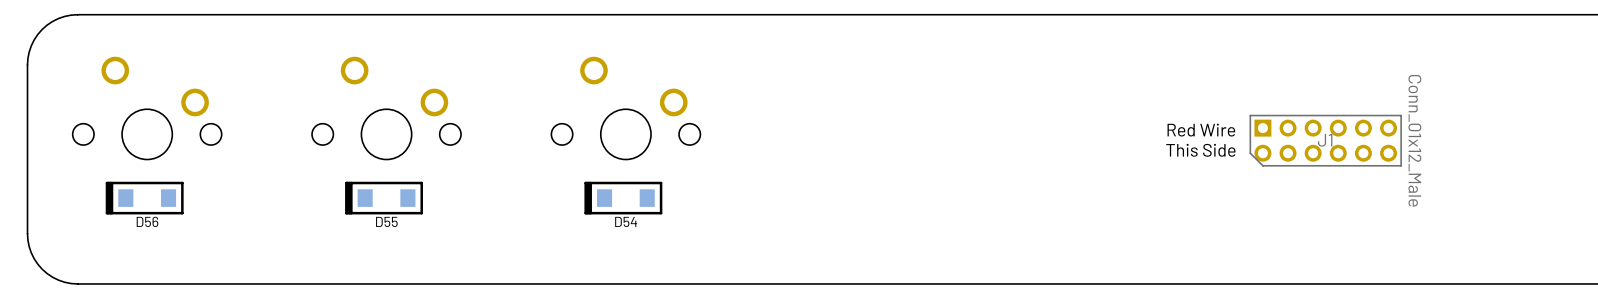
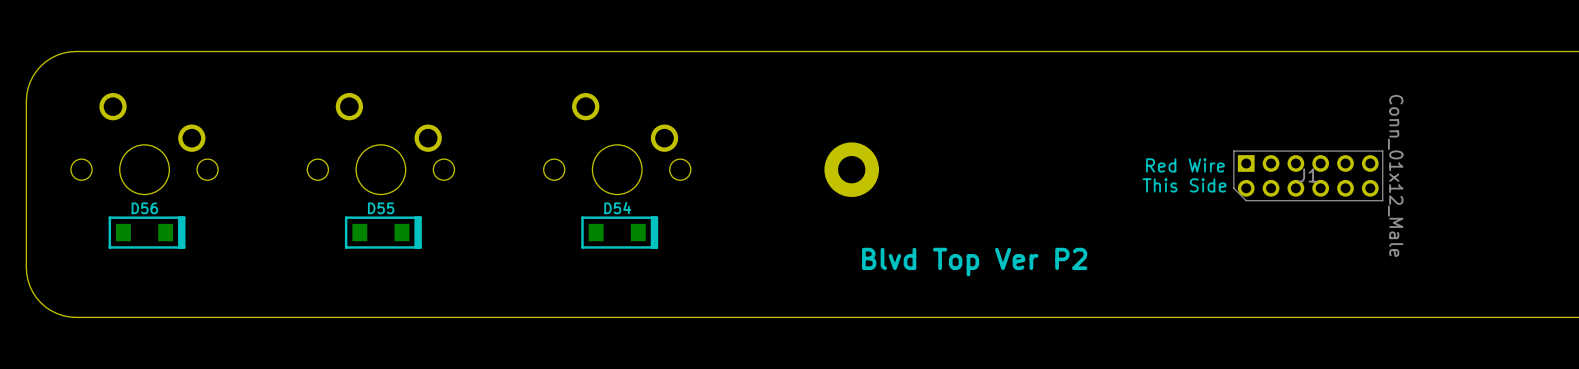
part: none -> (851, 169)
D56 rotation: 0° (144, 198) -> 180° (147, 232)
D55 rotation: 0° (384, 198) -> 180° (383, 232)
D54 rotation: 0° (623, 198) -> 180° (619, 232)
text: none -> Blvd Top Ver P2 (974, 262)

